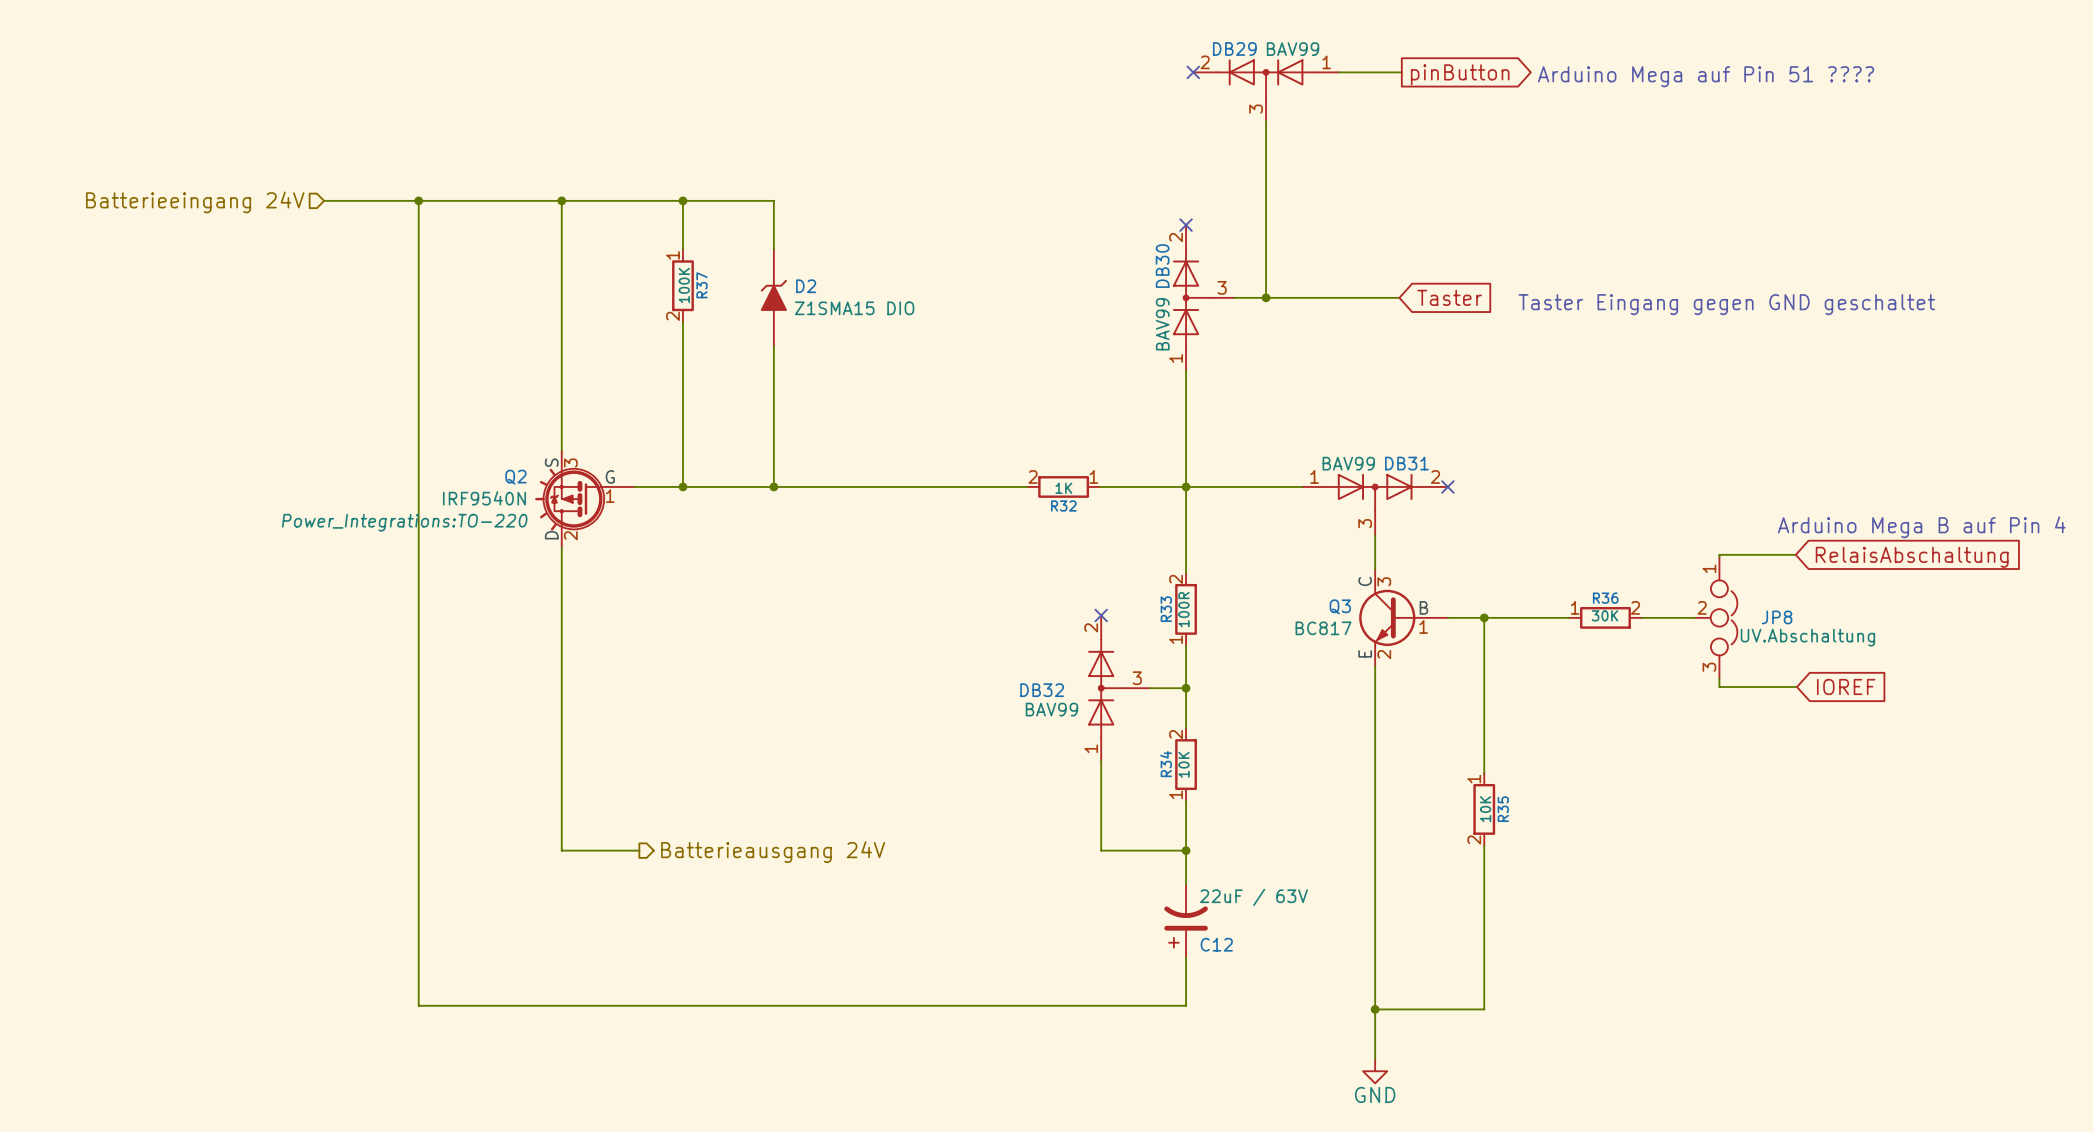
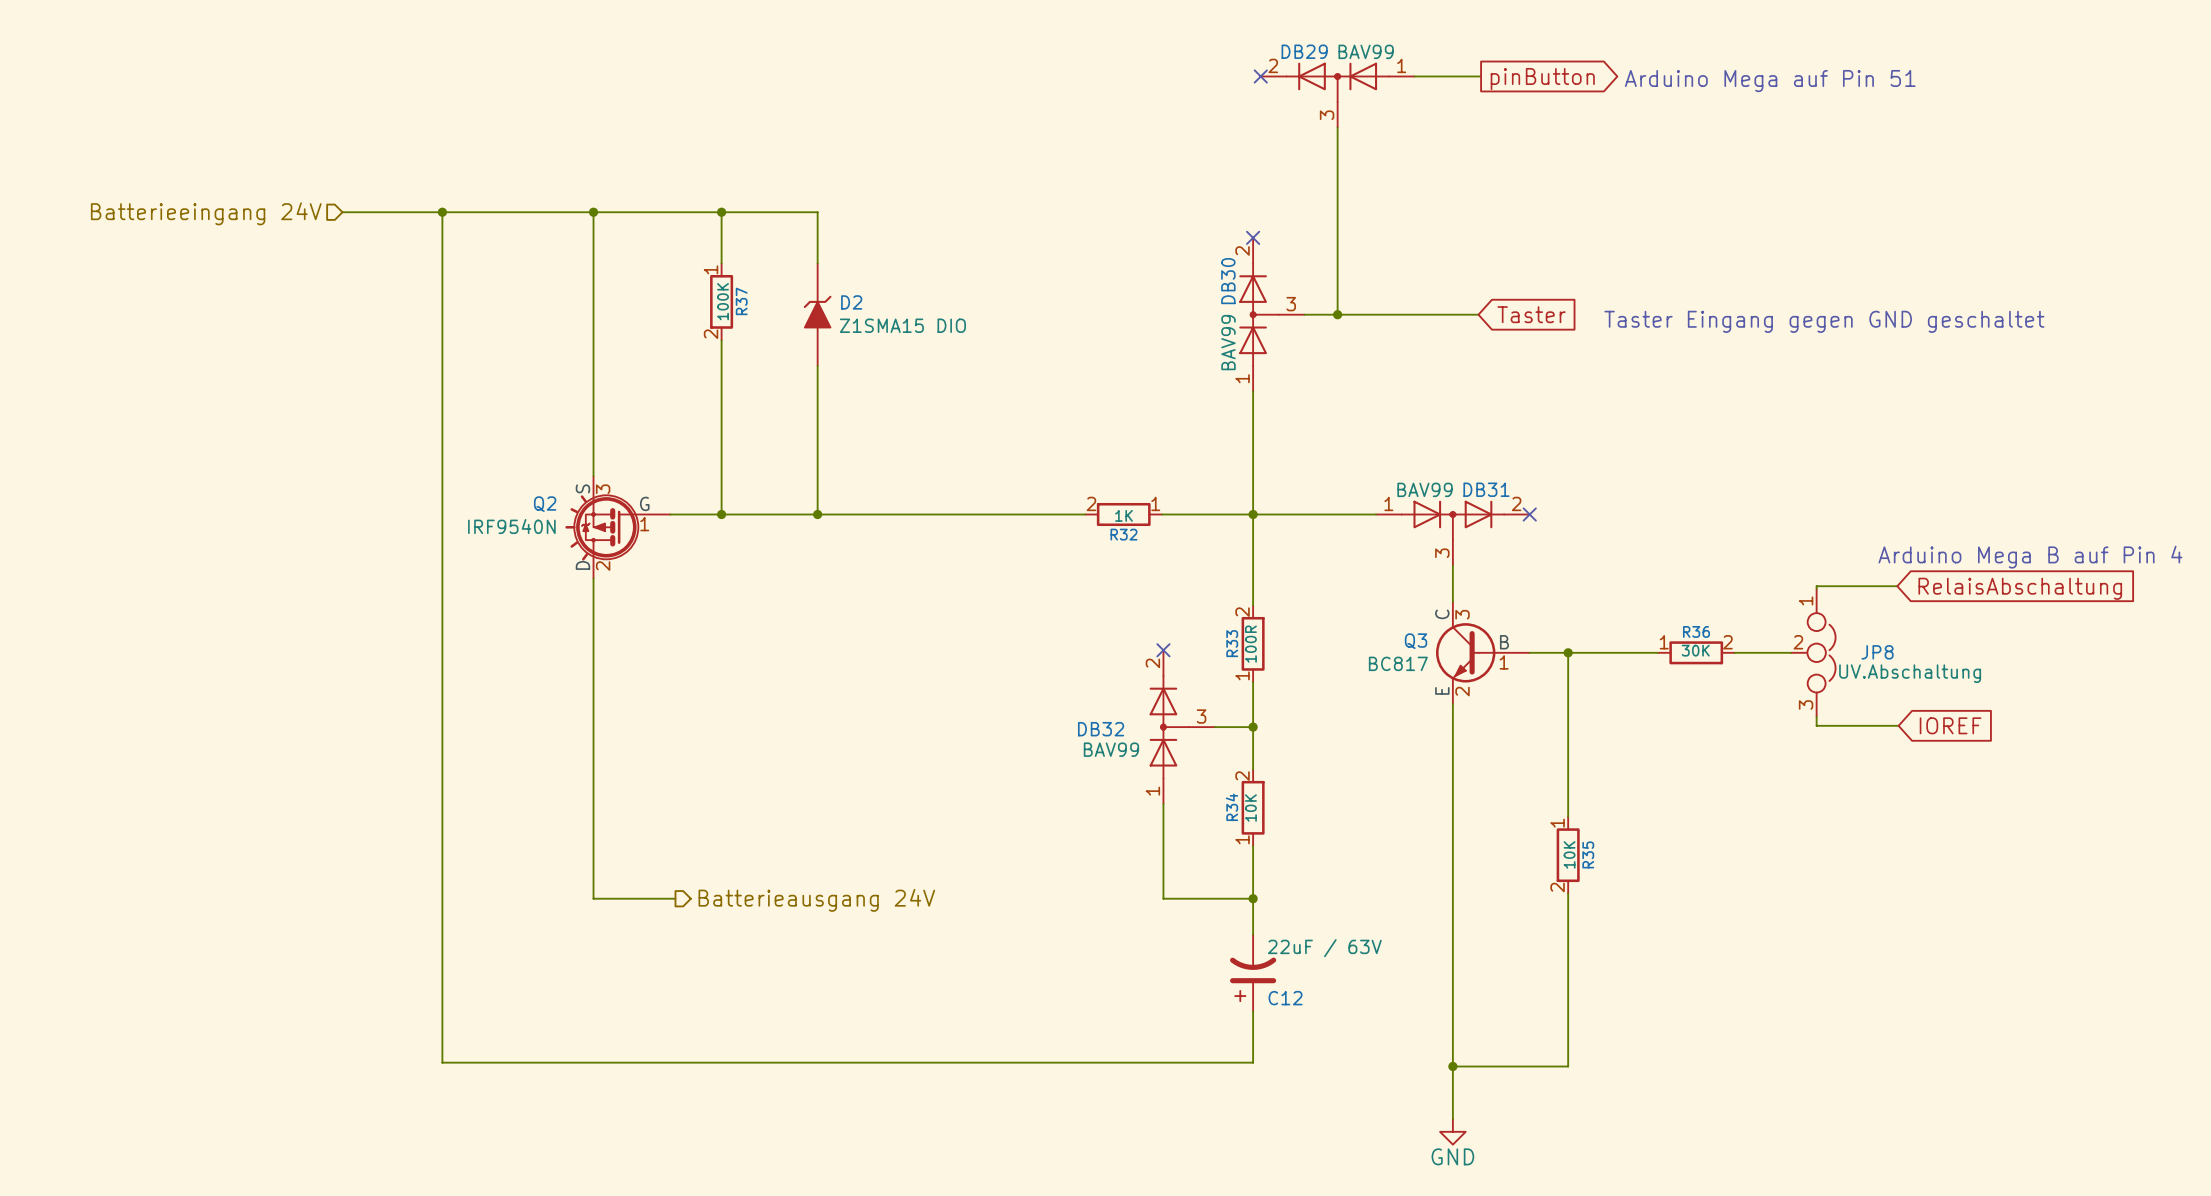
text: Arduino Mega auf Pin 51 ???? (1706, 76) -> Arduino Mega auf Pin 51 (1770, 81)
Q2 text: Power_Integrations:TO-220 (404, 522) -> none

